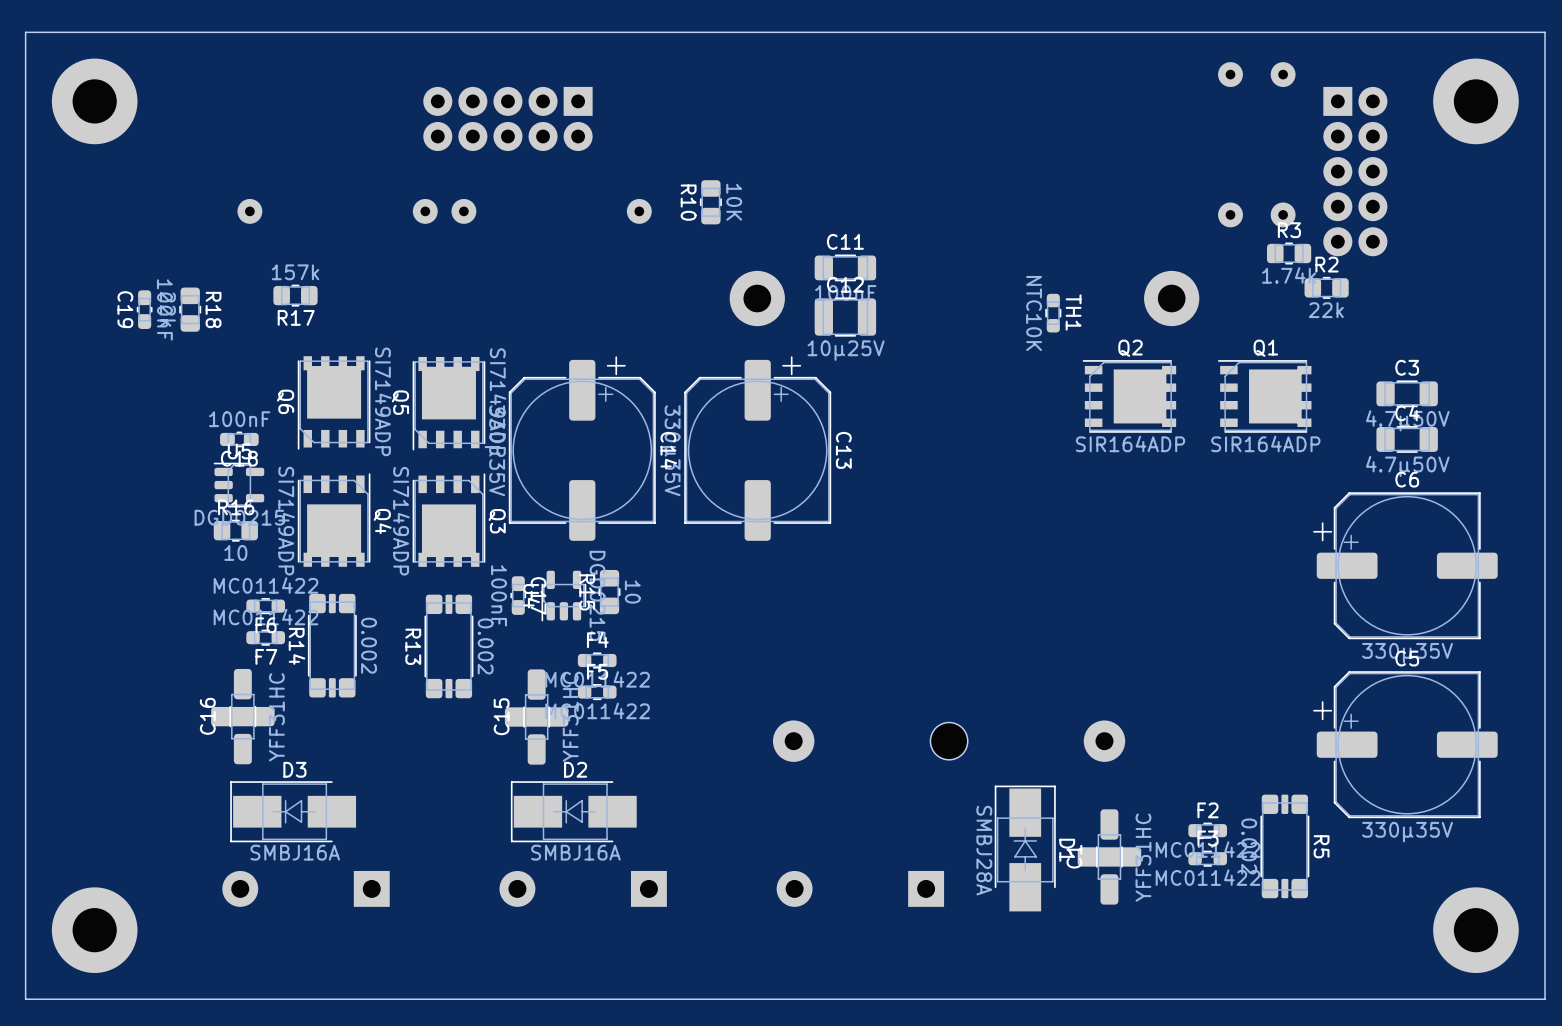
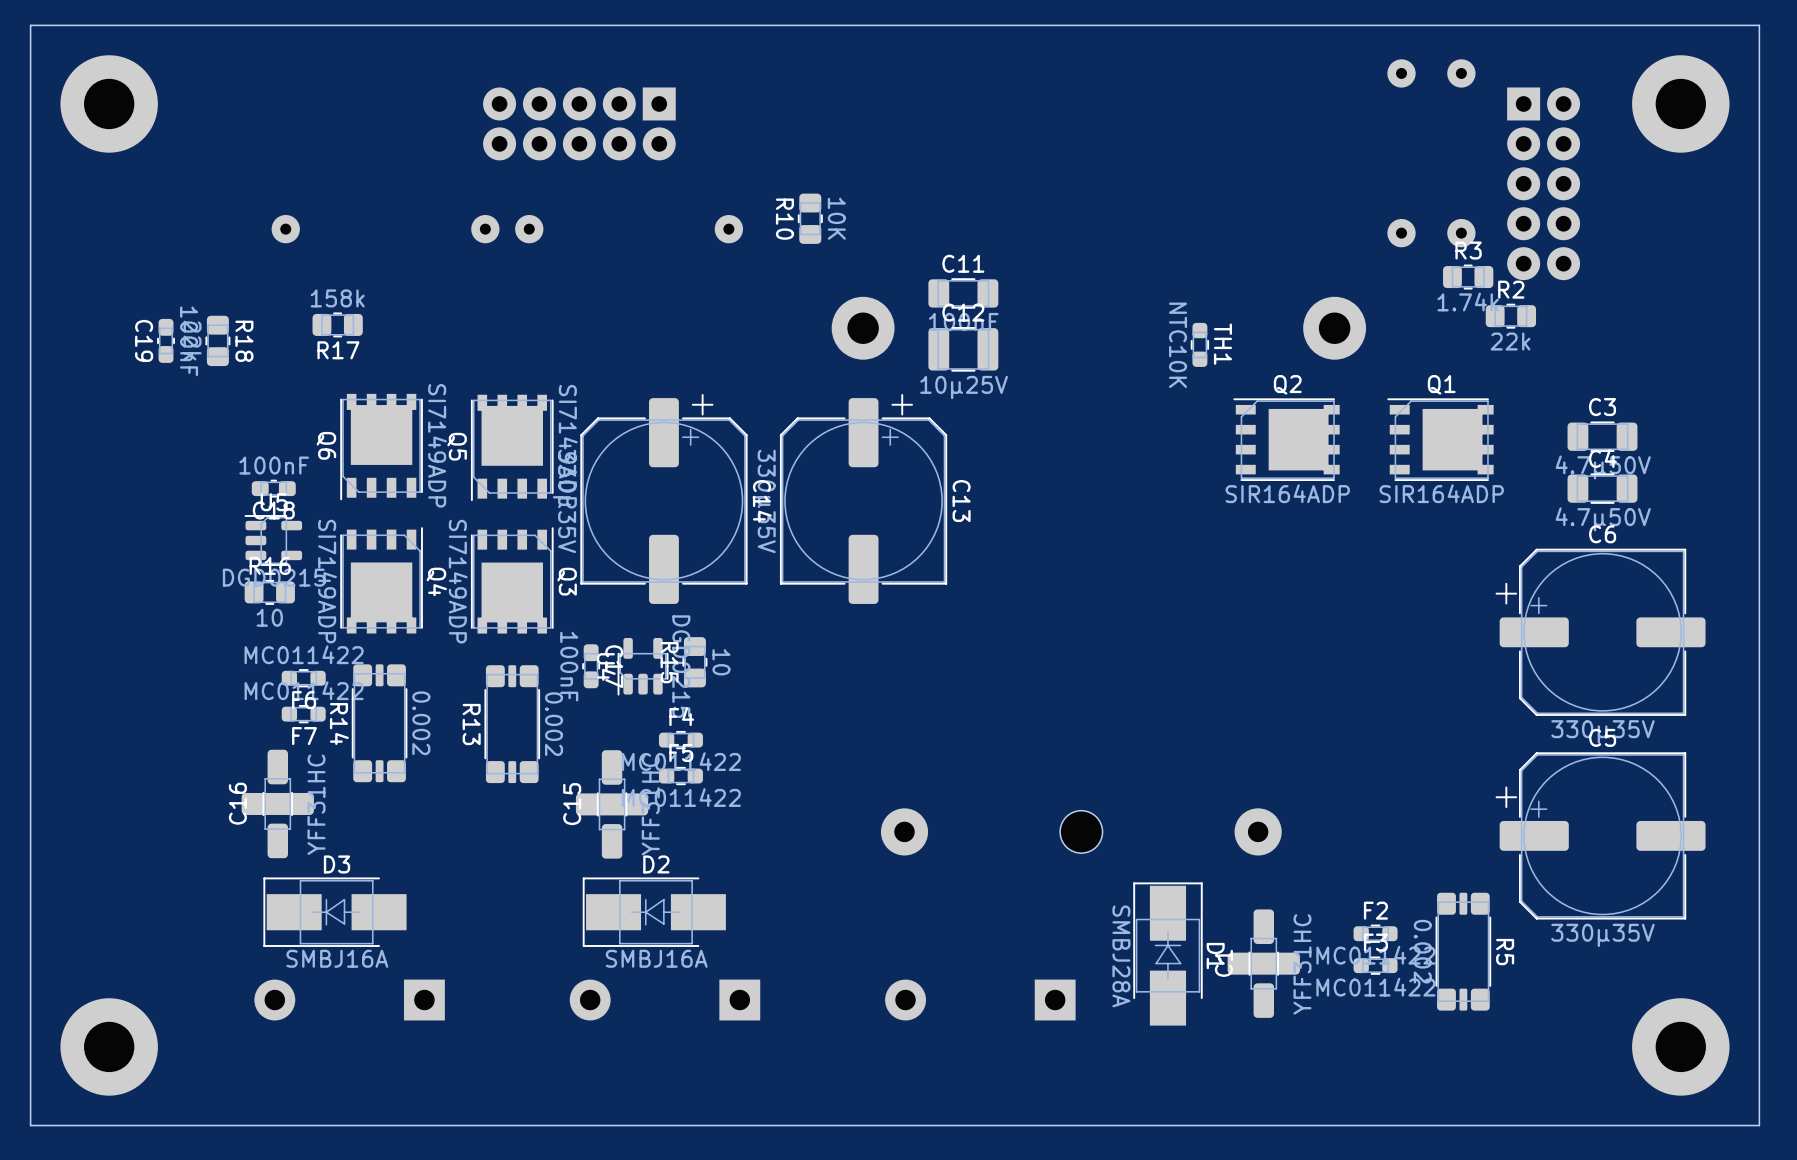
R17 value: 157k (295, 272) -> 158k (337, 298)

